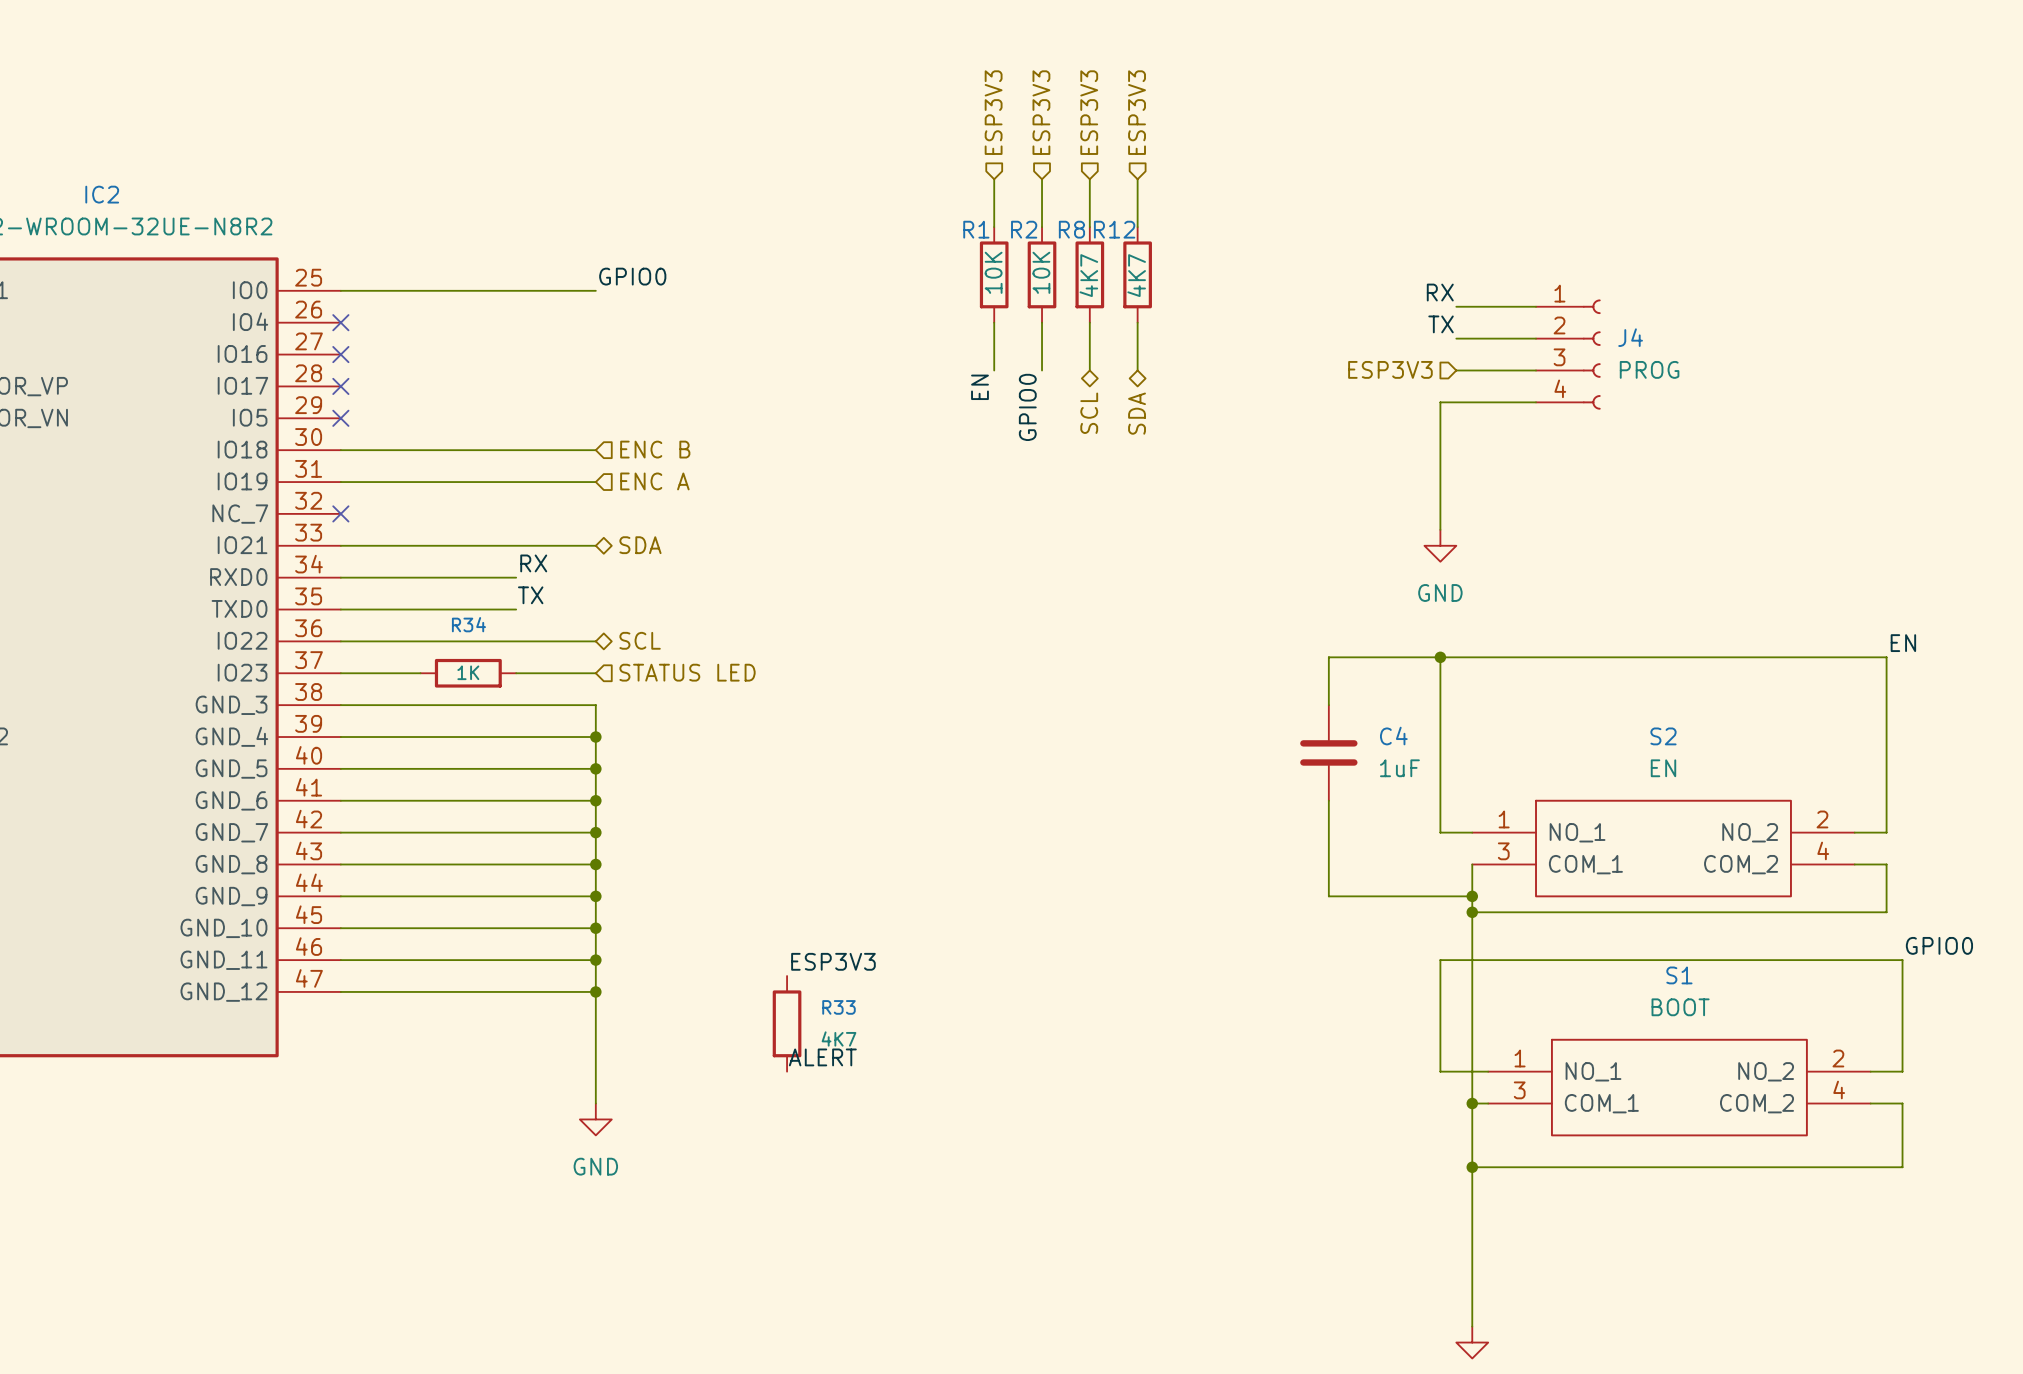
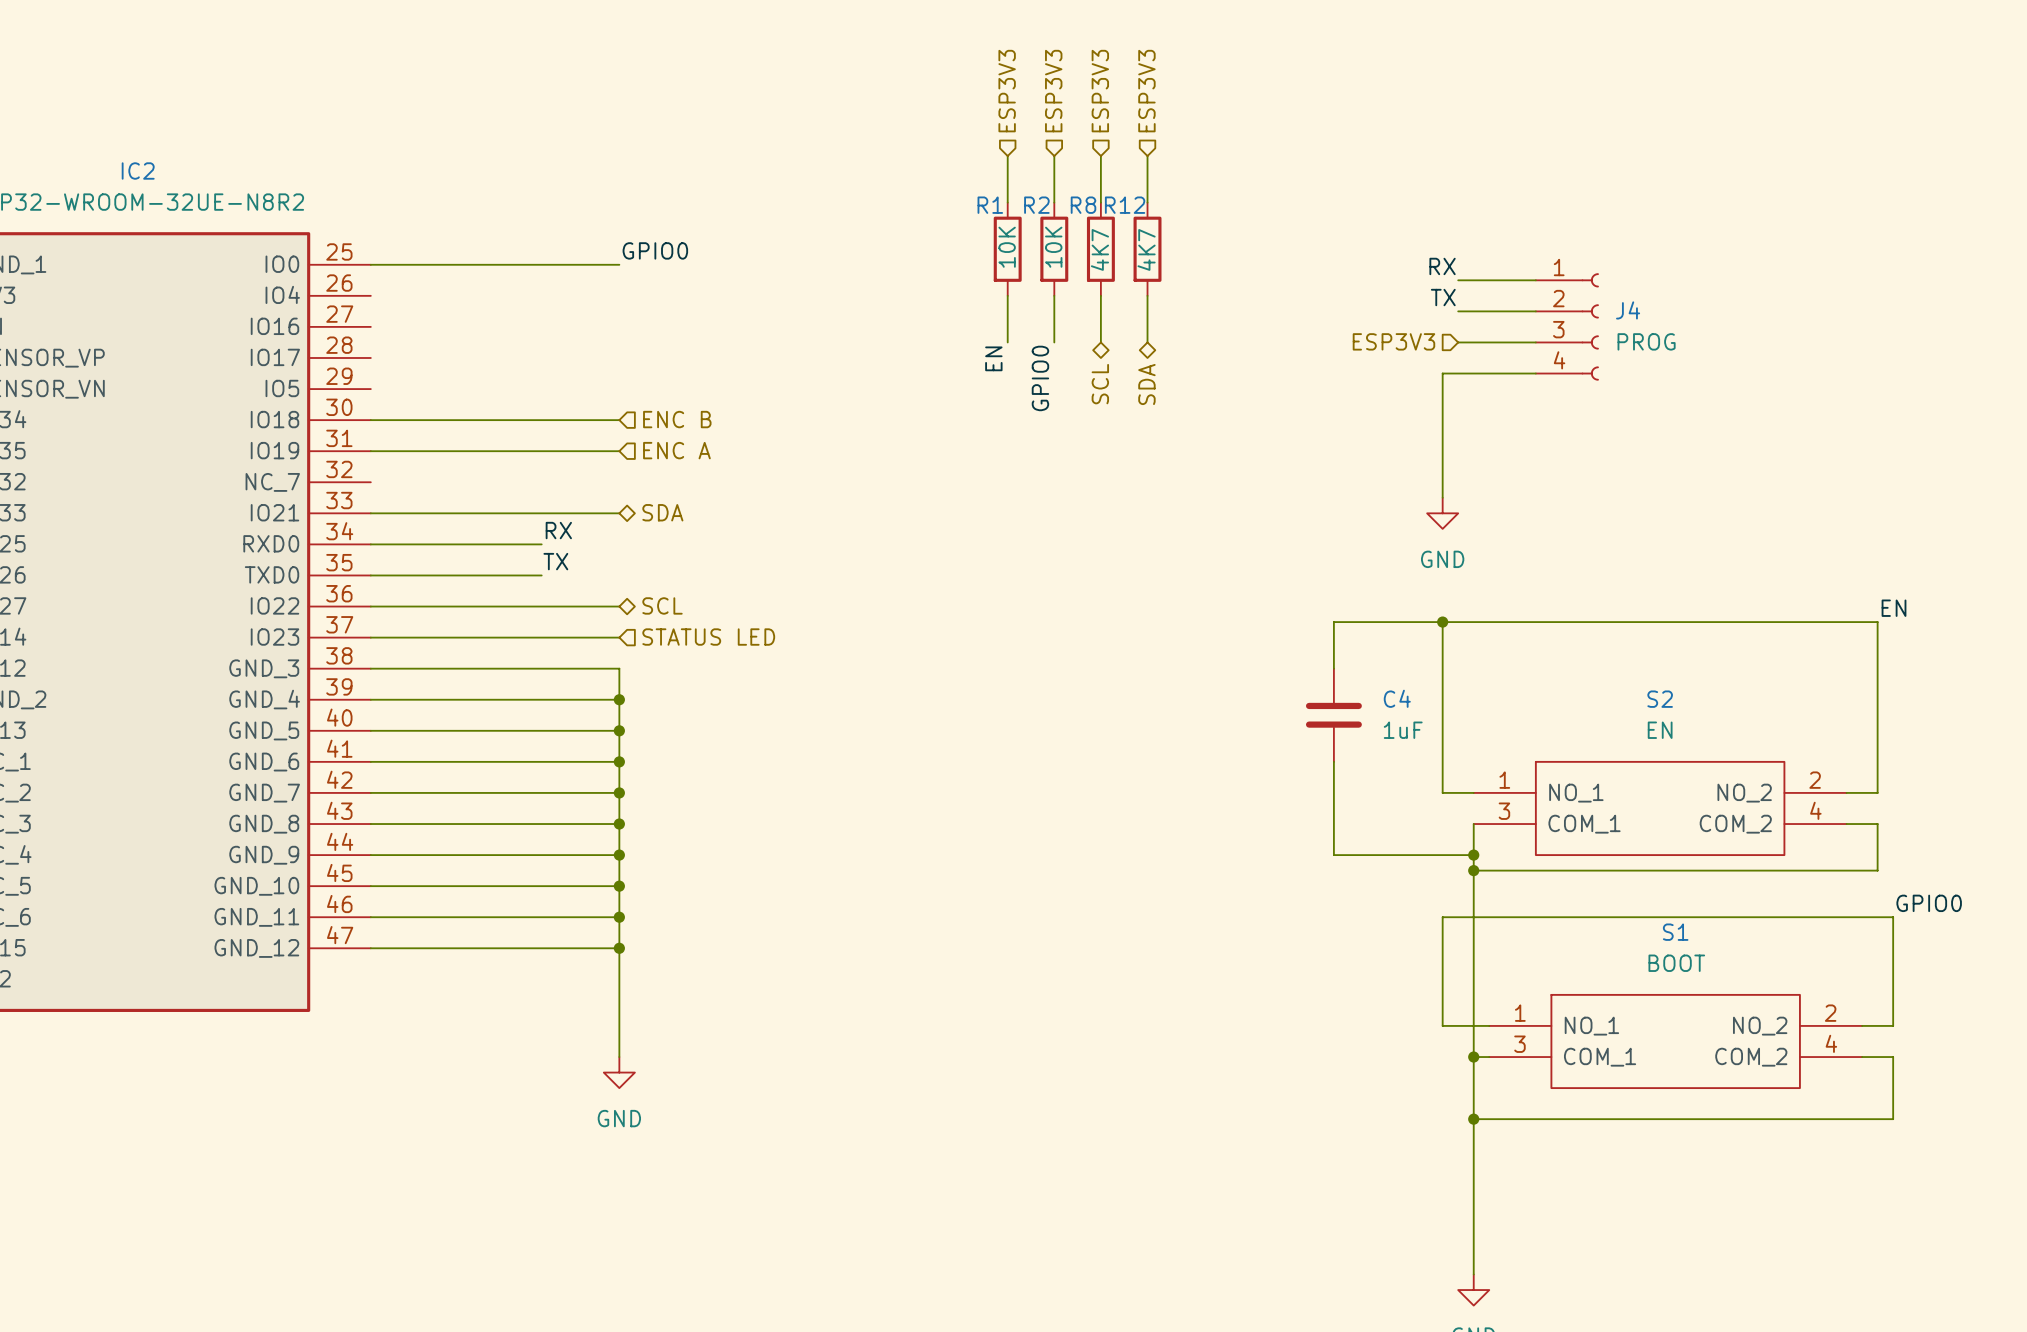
no-connect mark: (340, 322) -> none
no-connect mark: (340, 354) -> none
no-connect mark: (340, 386) -> none
no-connect mark: (340, 418) -> none
no-connect mark: (340, 513) -> none
wire: none -> (448, 637) (541, 637)
R34: 1K (468, 673) -> none
label: ESP3V3 (833, 961) -> none
R33: 4K7 (787, 1023) -> none
label: ALERT (822, 1057) -> none

